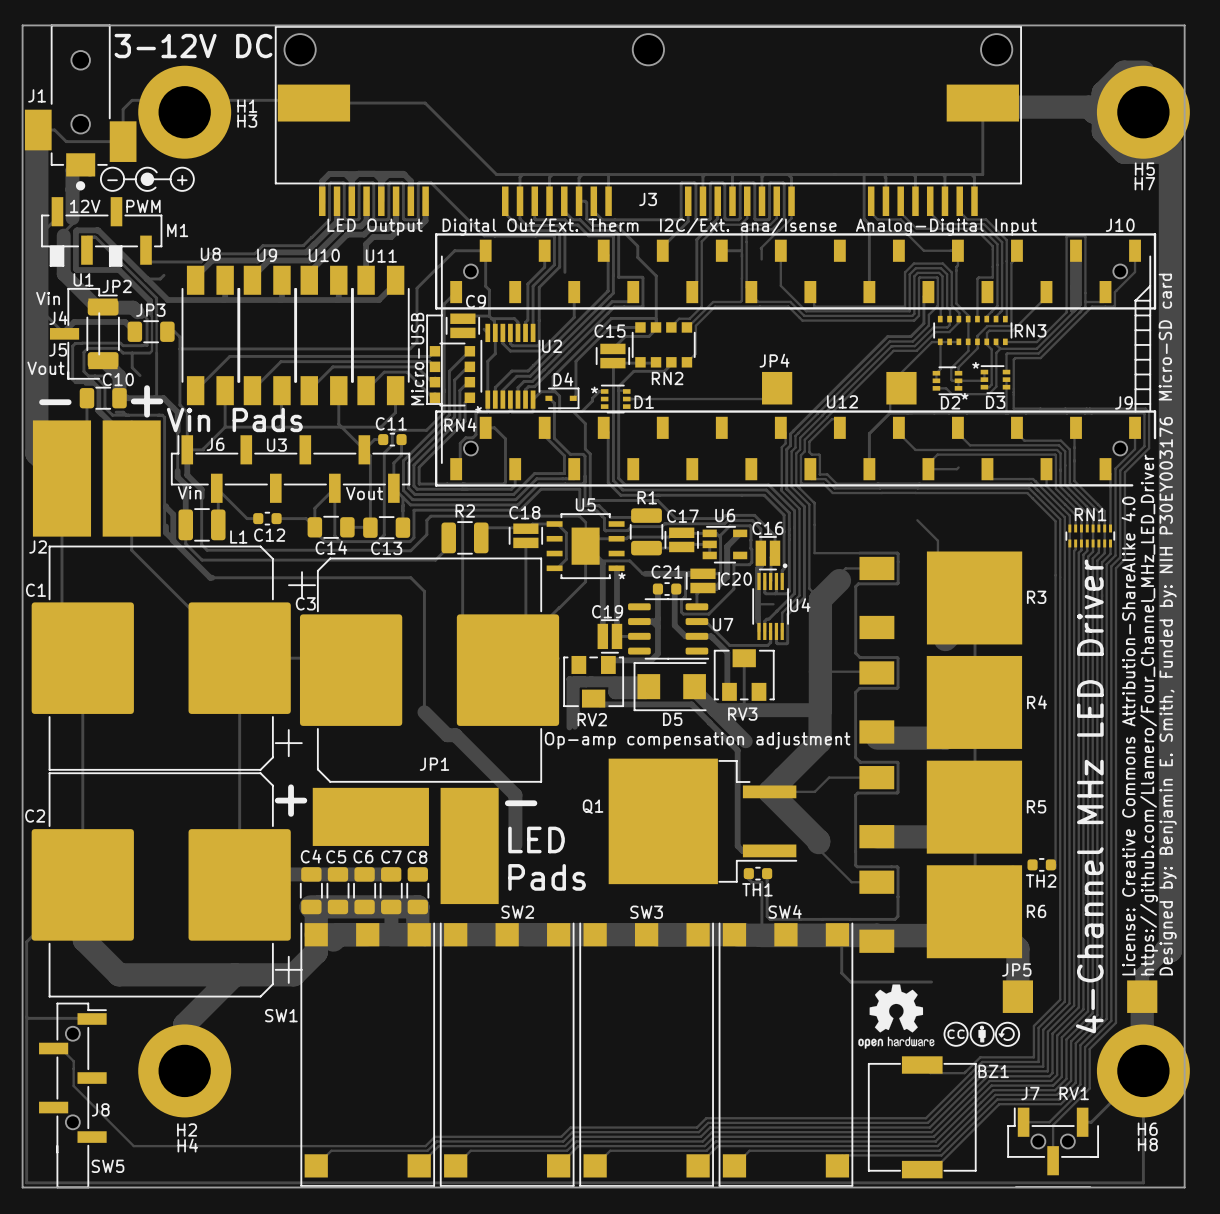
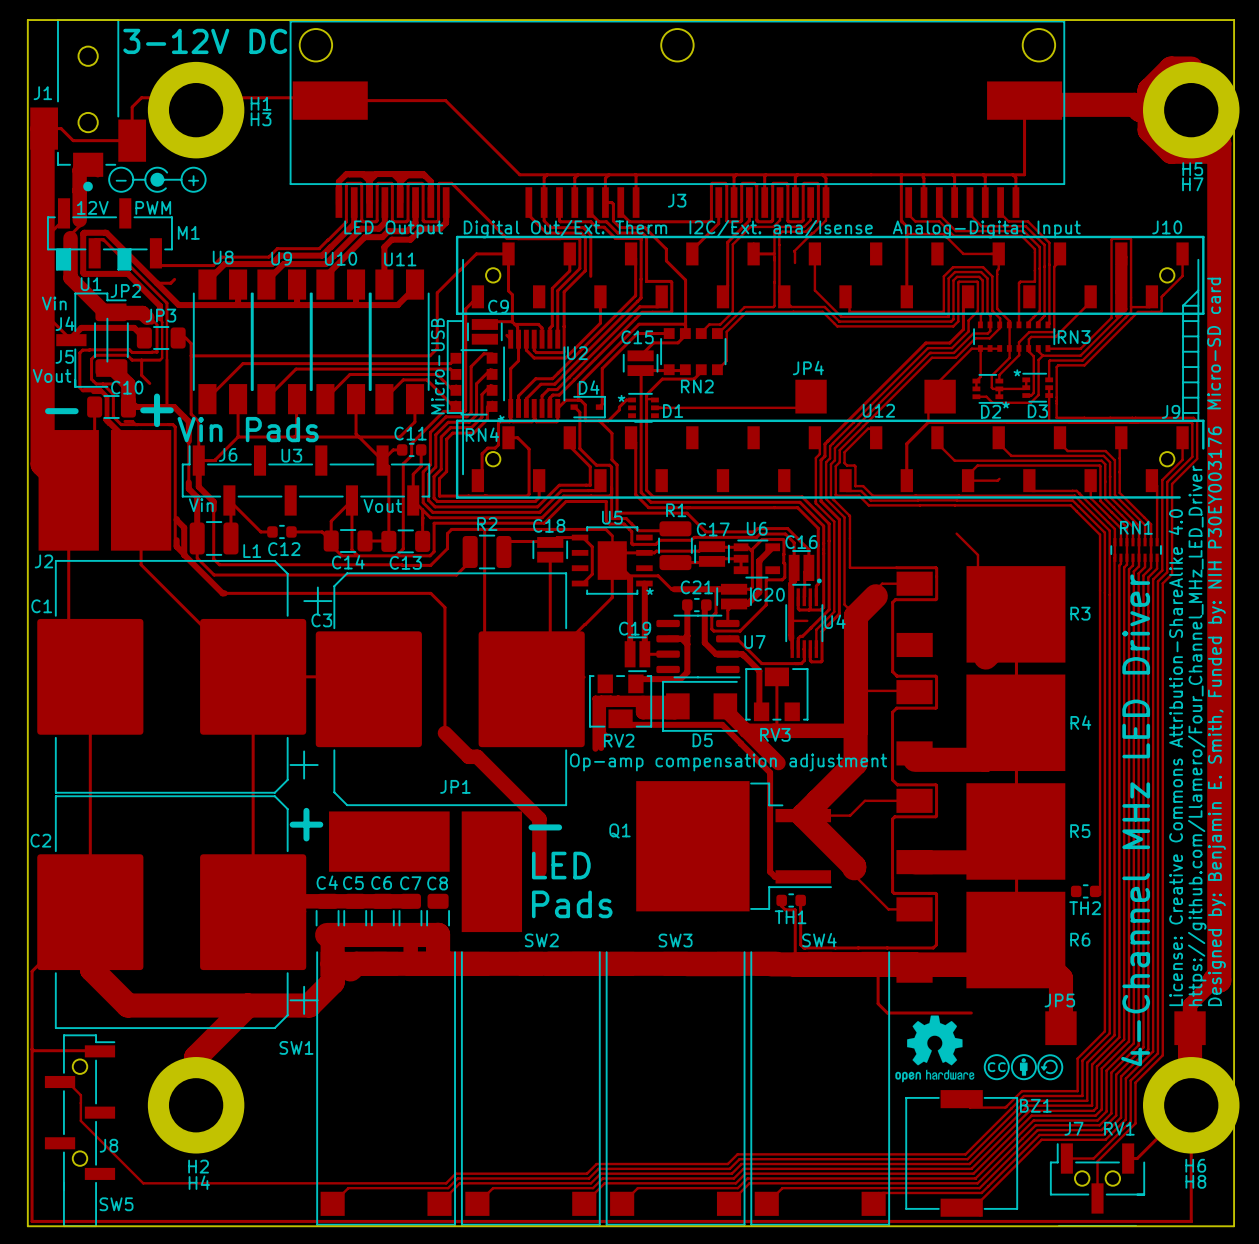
track: (444, 303) (444, 412) (426, 430) (396, 430) (392, 433) -> (465, 309) (465, 410) (443, 411) (411, 444)
track: (469, 351) (449, 371) (449, 414) (410, 453) -> (492, 353) (483, 353) (471, 366) (471, 412) (466, 416) (446, 416) (430, 432) (430, 464)
track: (469, 366) (454, 380) (454, 417) (415, 456) -> (492, 369) (476, 383) (476, 414) (469, 422) (448, 422) (435, 434) (435, 467)
track: (469, 382) (459, 390) (459, 419) (420, 458) -> (492, 385) (481, 394) (481, 417) (471, 427) (450, 427) (441, 437) (441, 469)
track: (469, 397) (465, 402) (465, 421) (426, 460) -> (492, 402) (487, 406) (487, 419) (473, 433) (452, 433) (446, 439) (446, 471)

